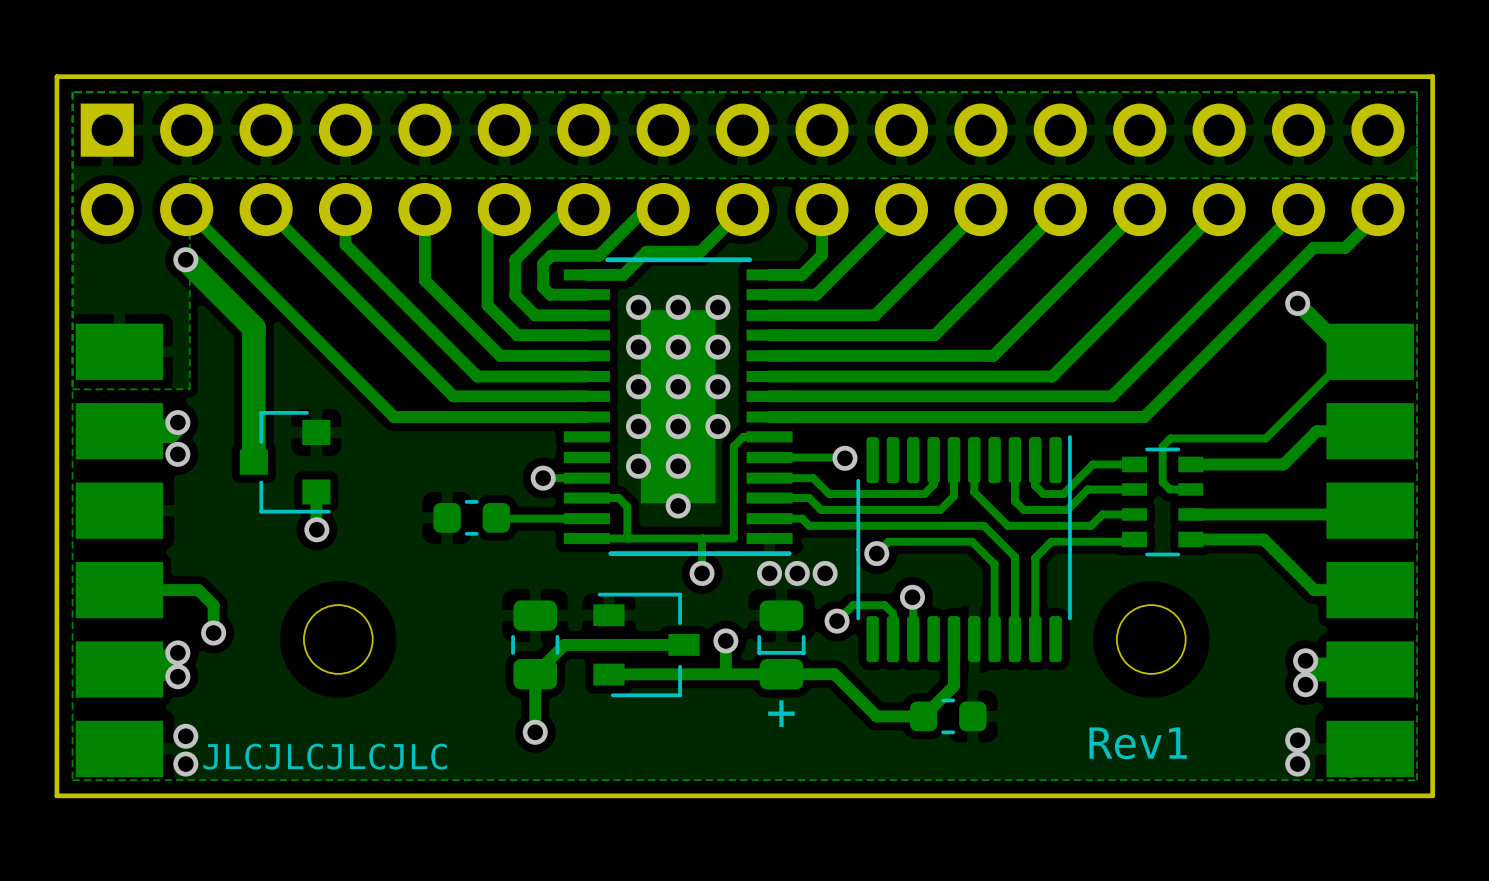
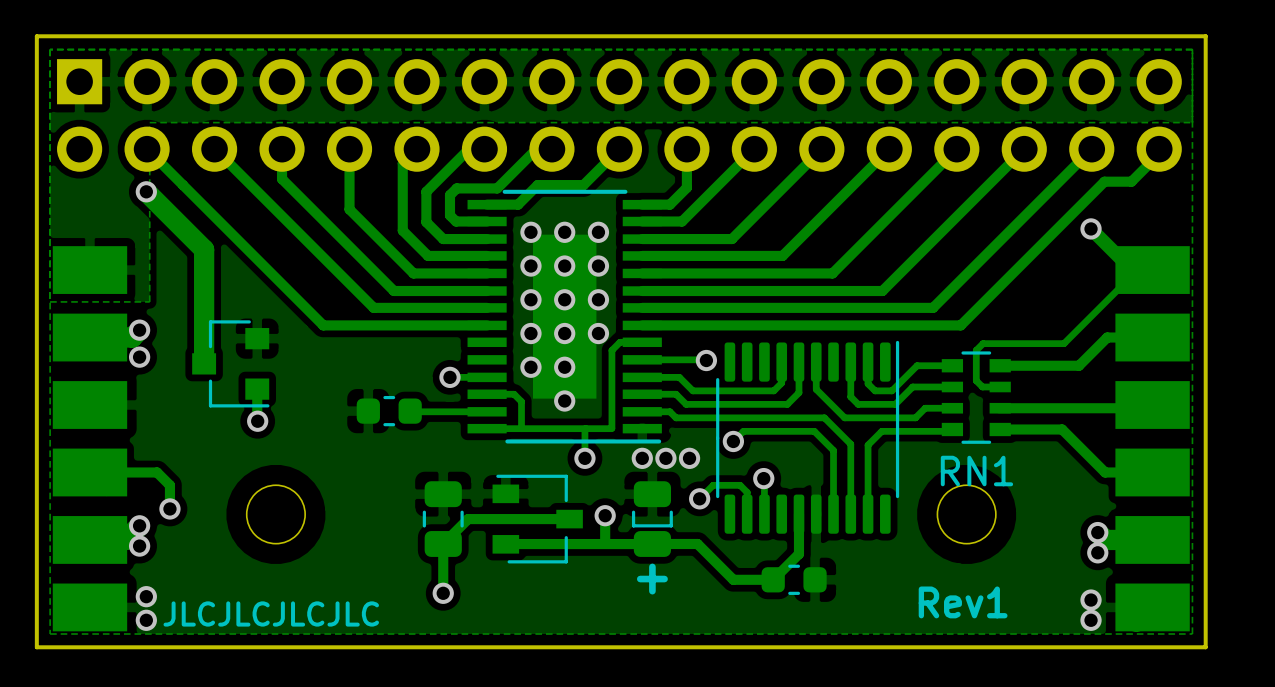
RN1 name: none -> RN1 (976, 471)

